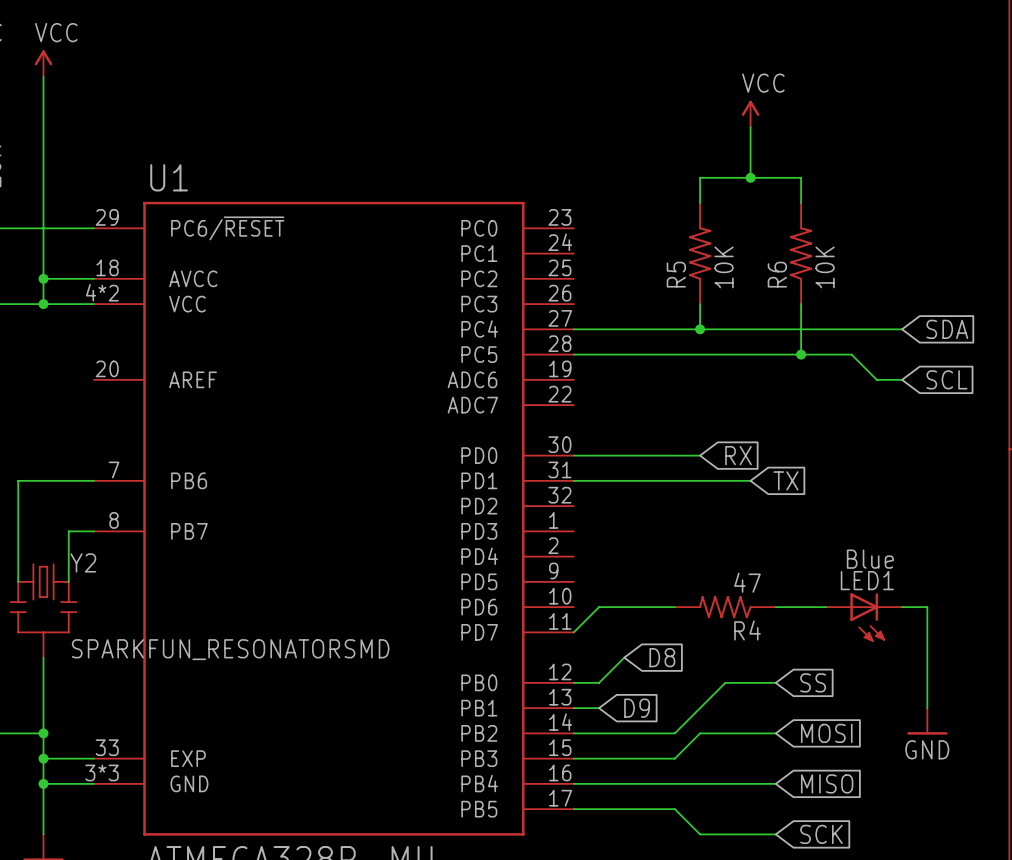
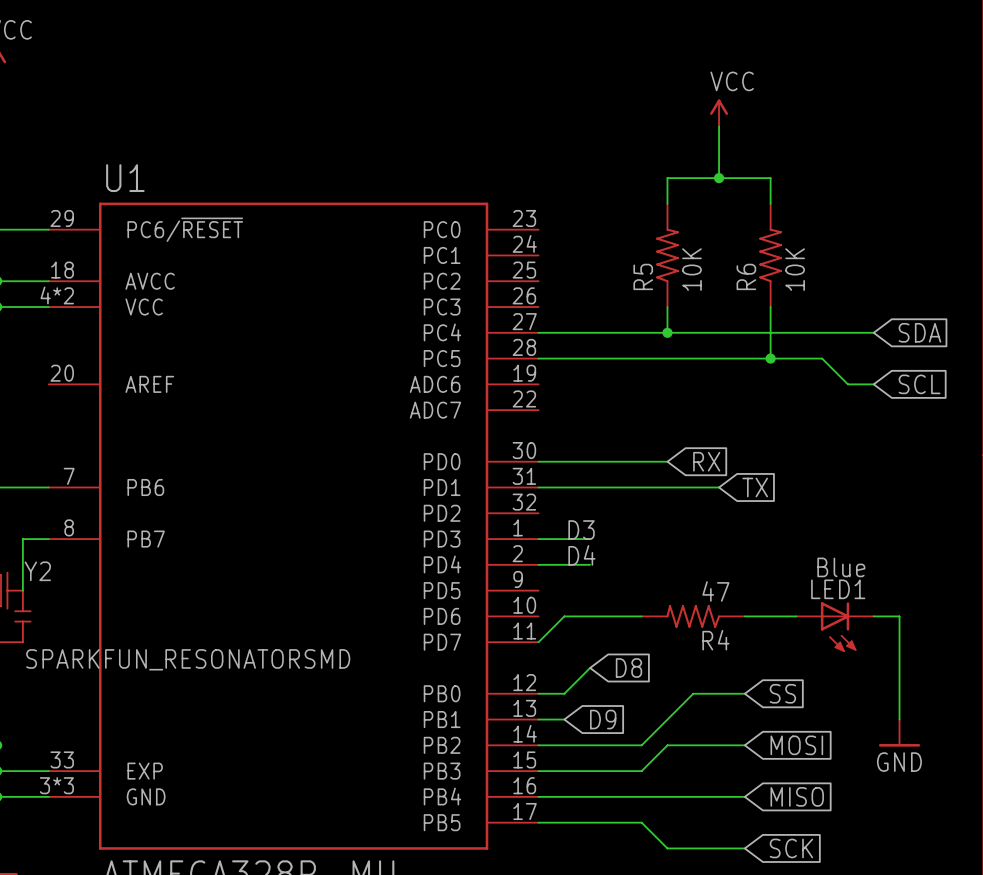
label: none -> D3 (581, 530)
wire: none -> (538, 539) (590, 539)
label: none -> D4 (581, 555)
wire: none -> (538, 564) (590, 564)

